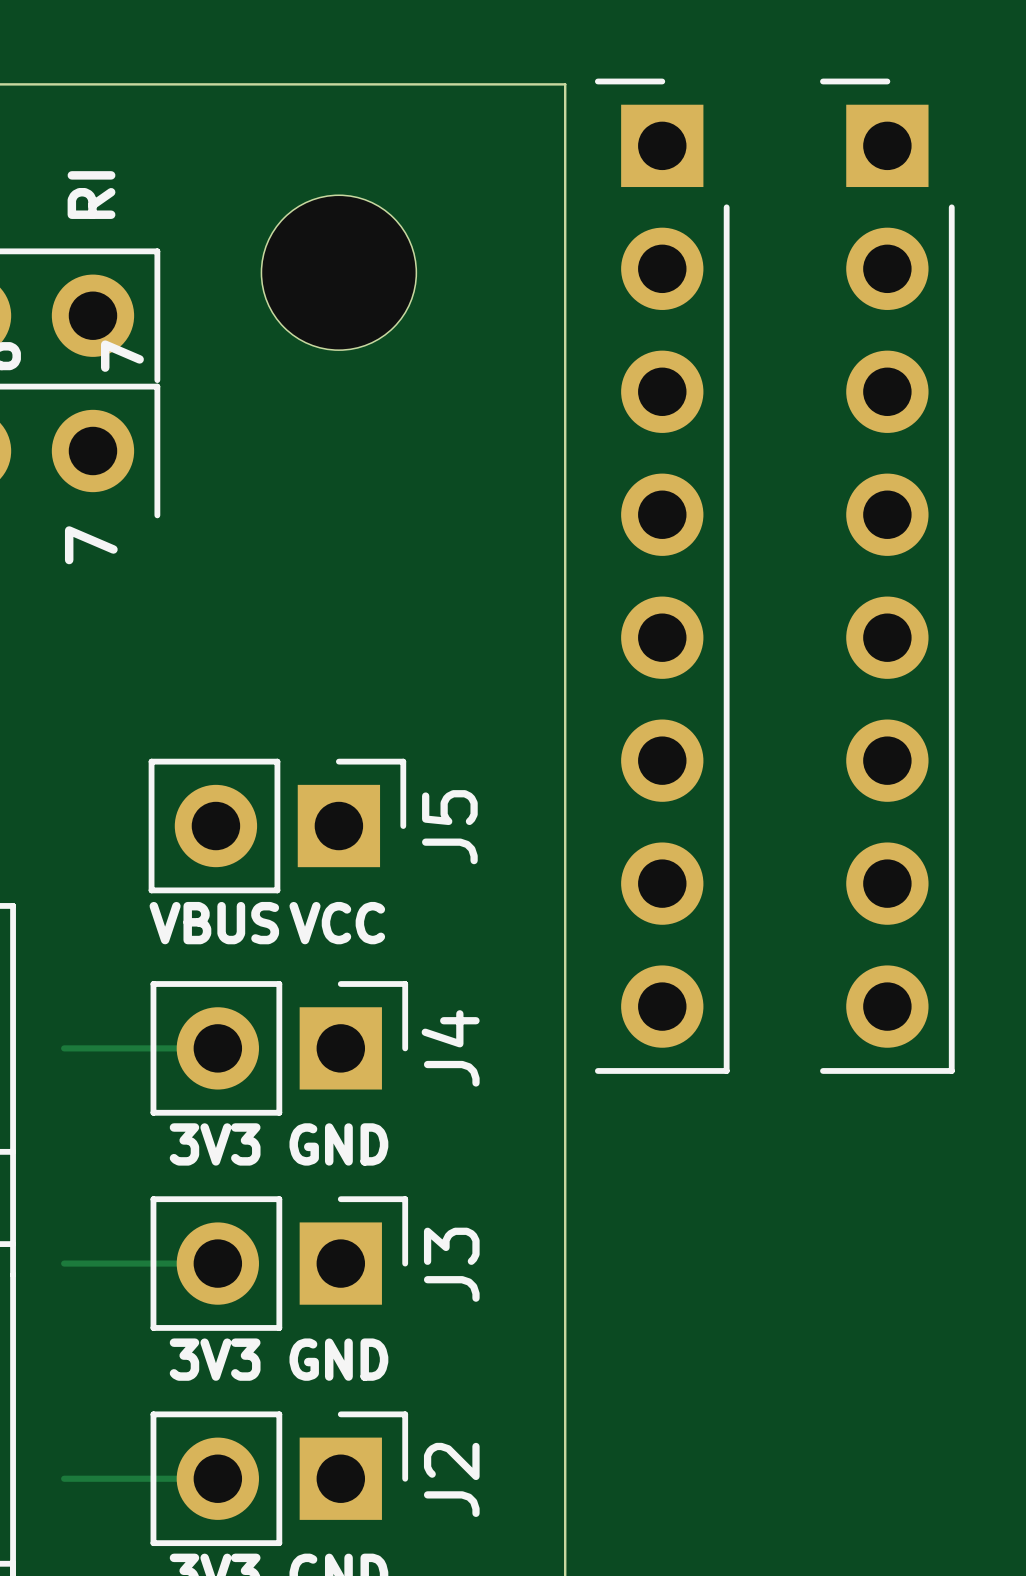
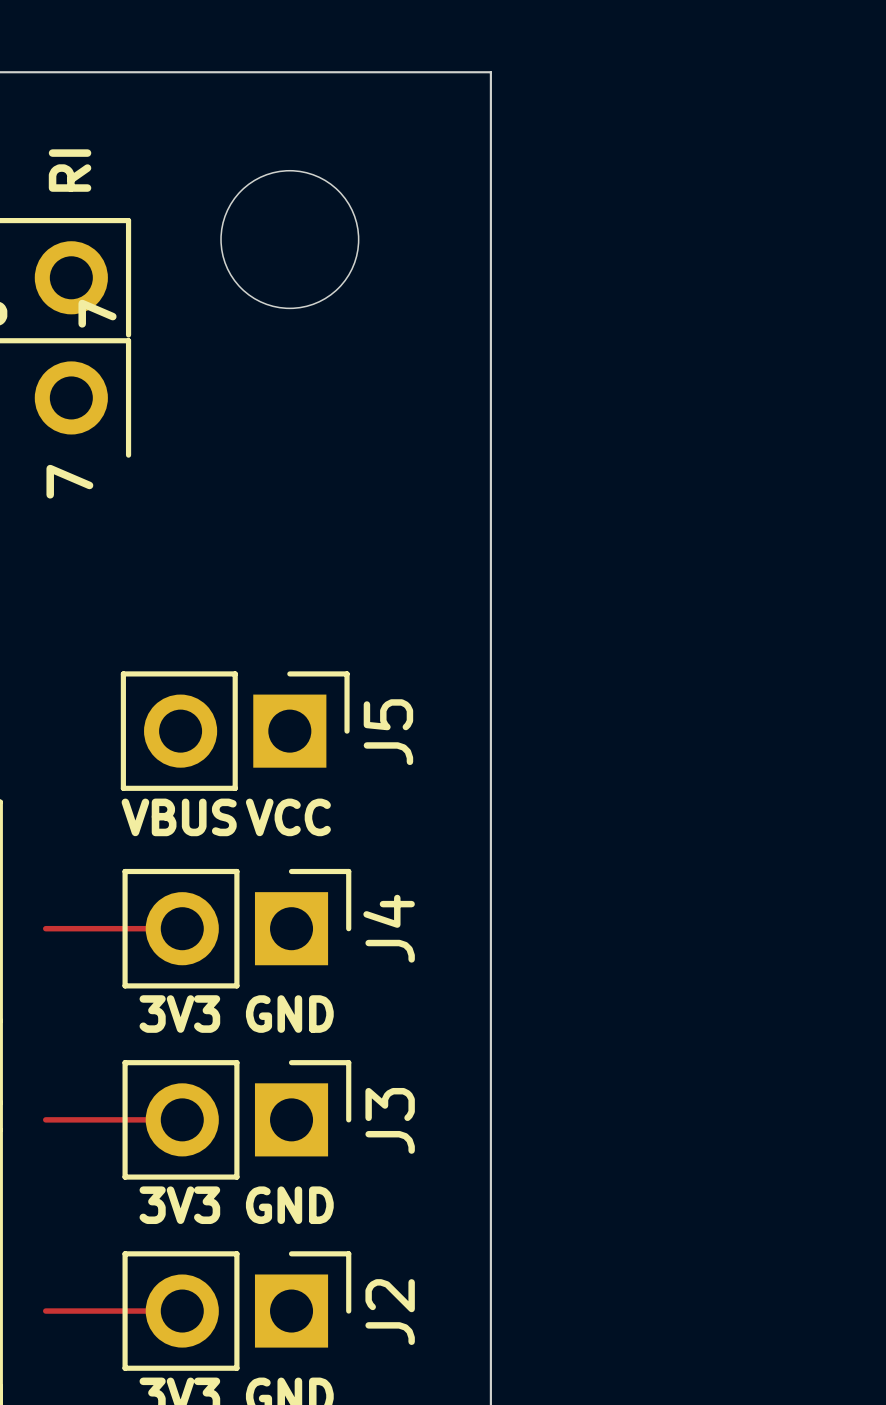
part: (662, 576) -> none
part: (887, 576) -> none

